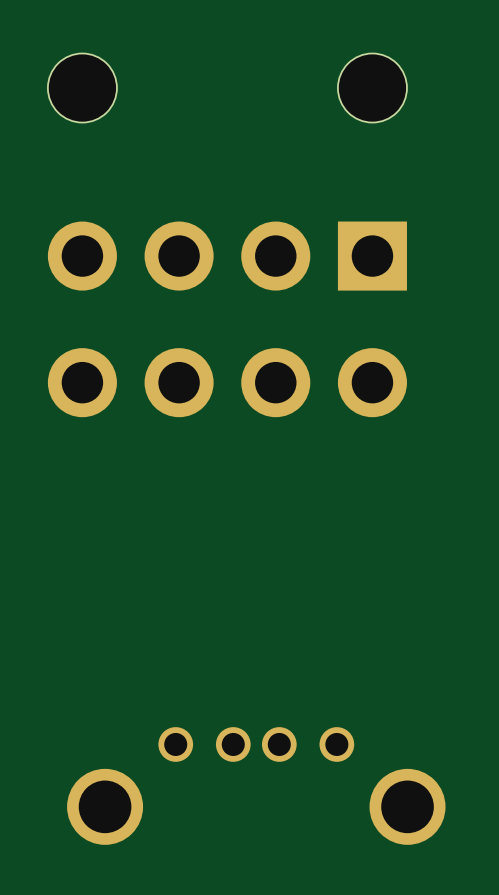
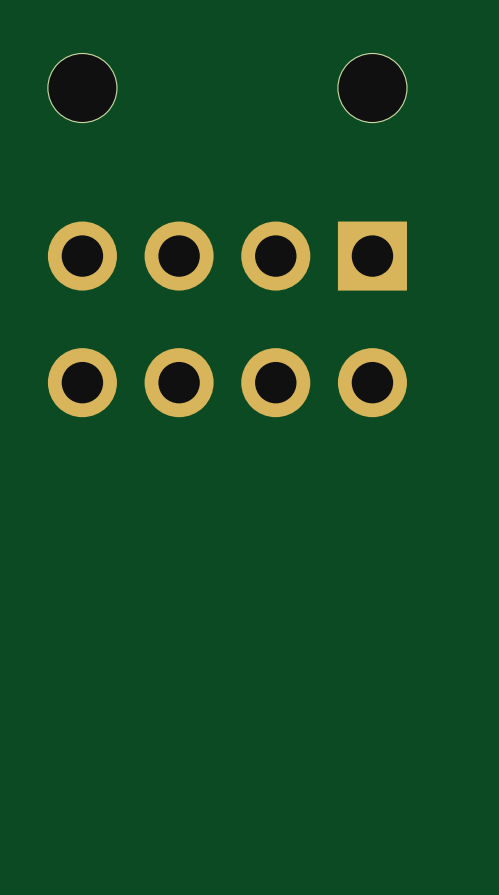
part: (256, 785) -> none

